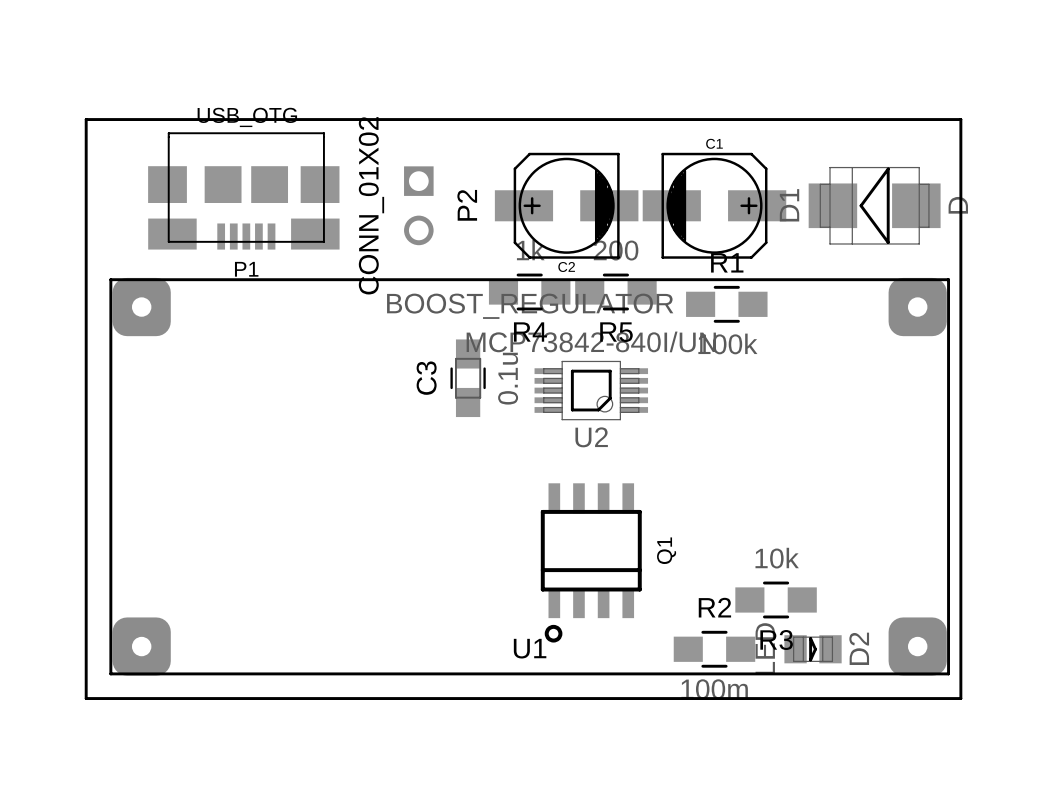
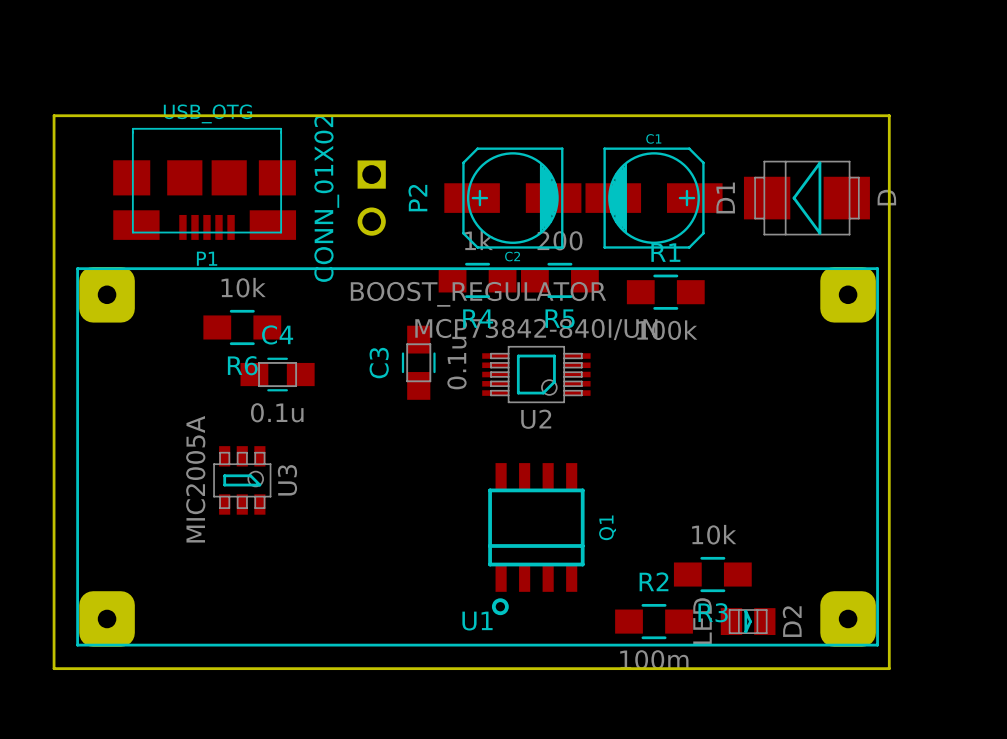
R6: none -> 10k (242, 327)
C4: none -> 0.1u (277, 374)
U3: none -> MIC2005A (242, 480)

